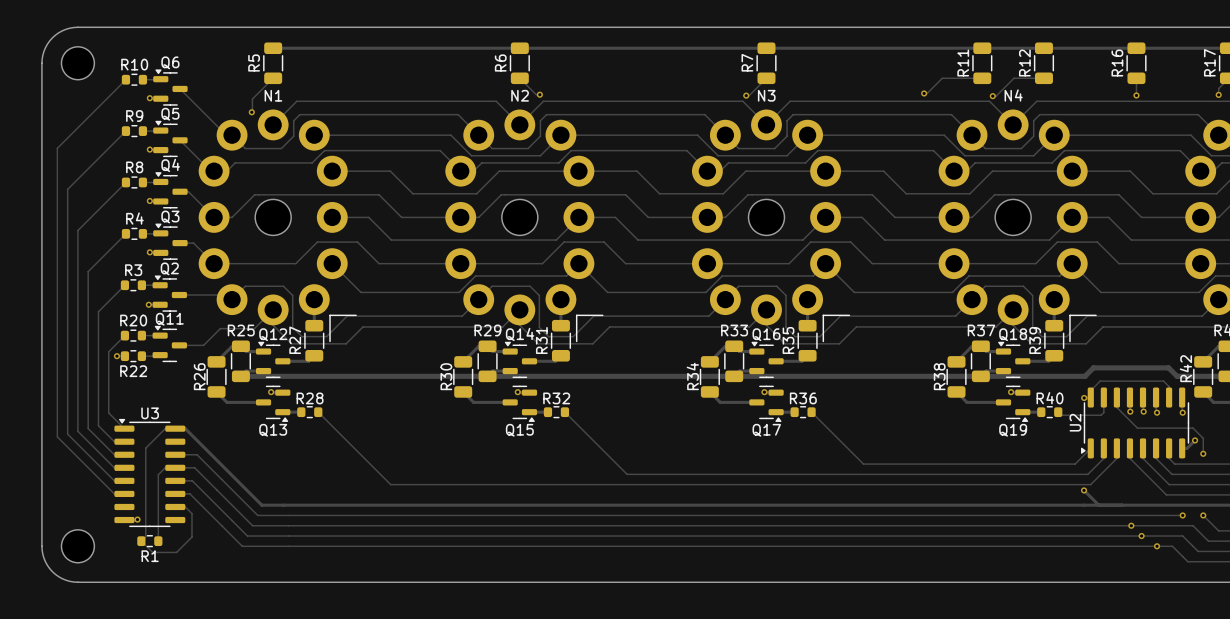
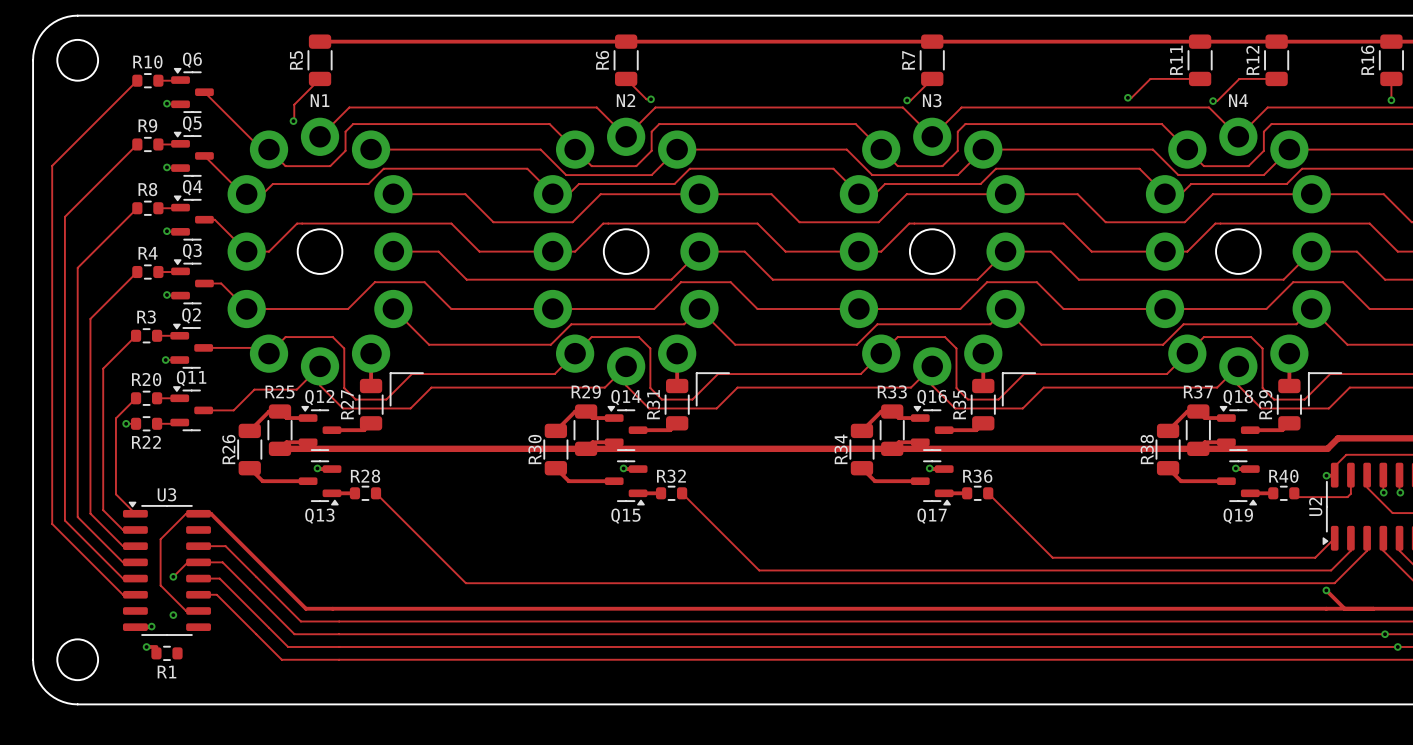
track: (145, 448) (145, 536) (141, 541) (152, 552) (176, 552) (191, 537) (191, 513) (185, 506) (175, 506) -> (161, 538) (160, 585) (186, 610) (198, 610)
track: (166, 467) (158, 474) (158, 541) -> (187, 562) (173, 576)
via: none -> (173, 576)
via: none -> (173, 615)
track: none -> (146, 647) (156, 647)
via: none -> (146, 647)

